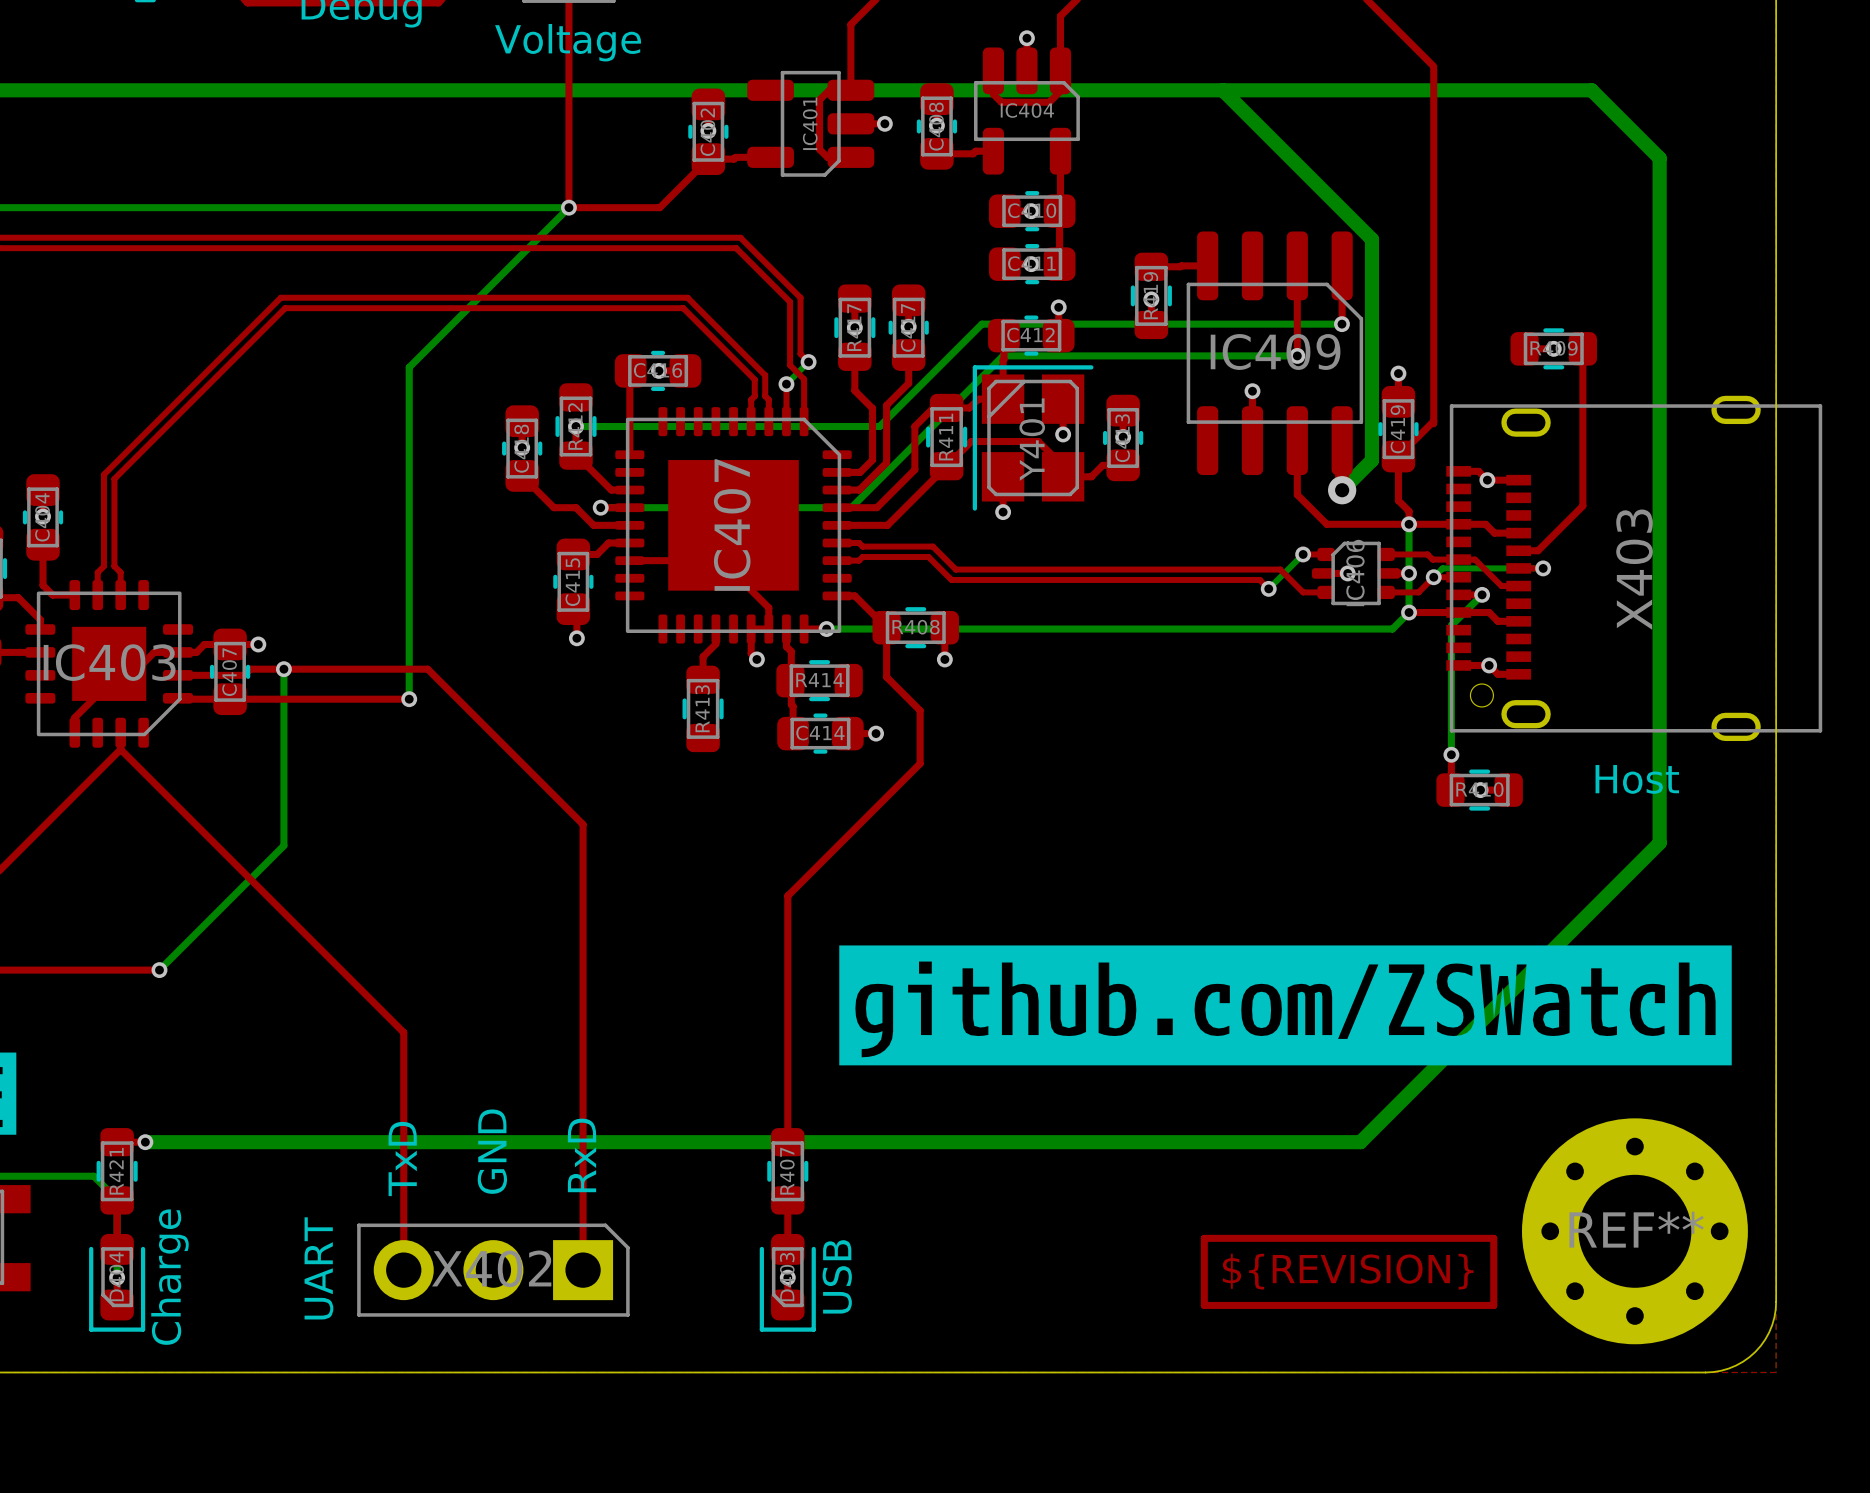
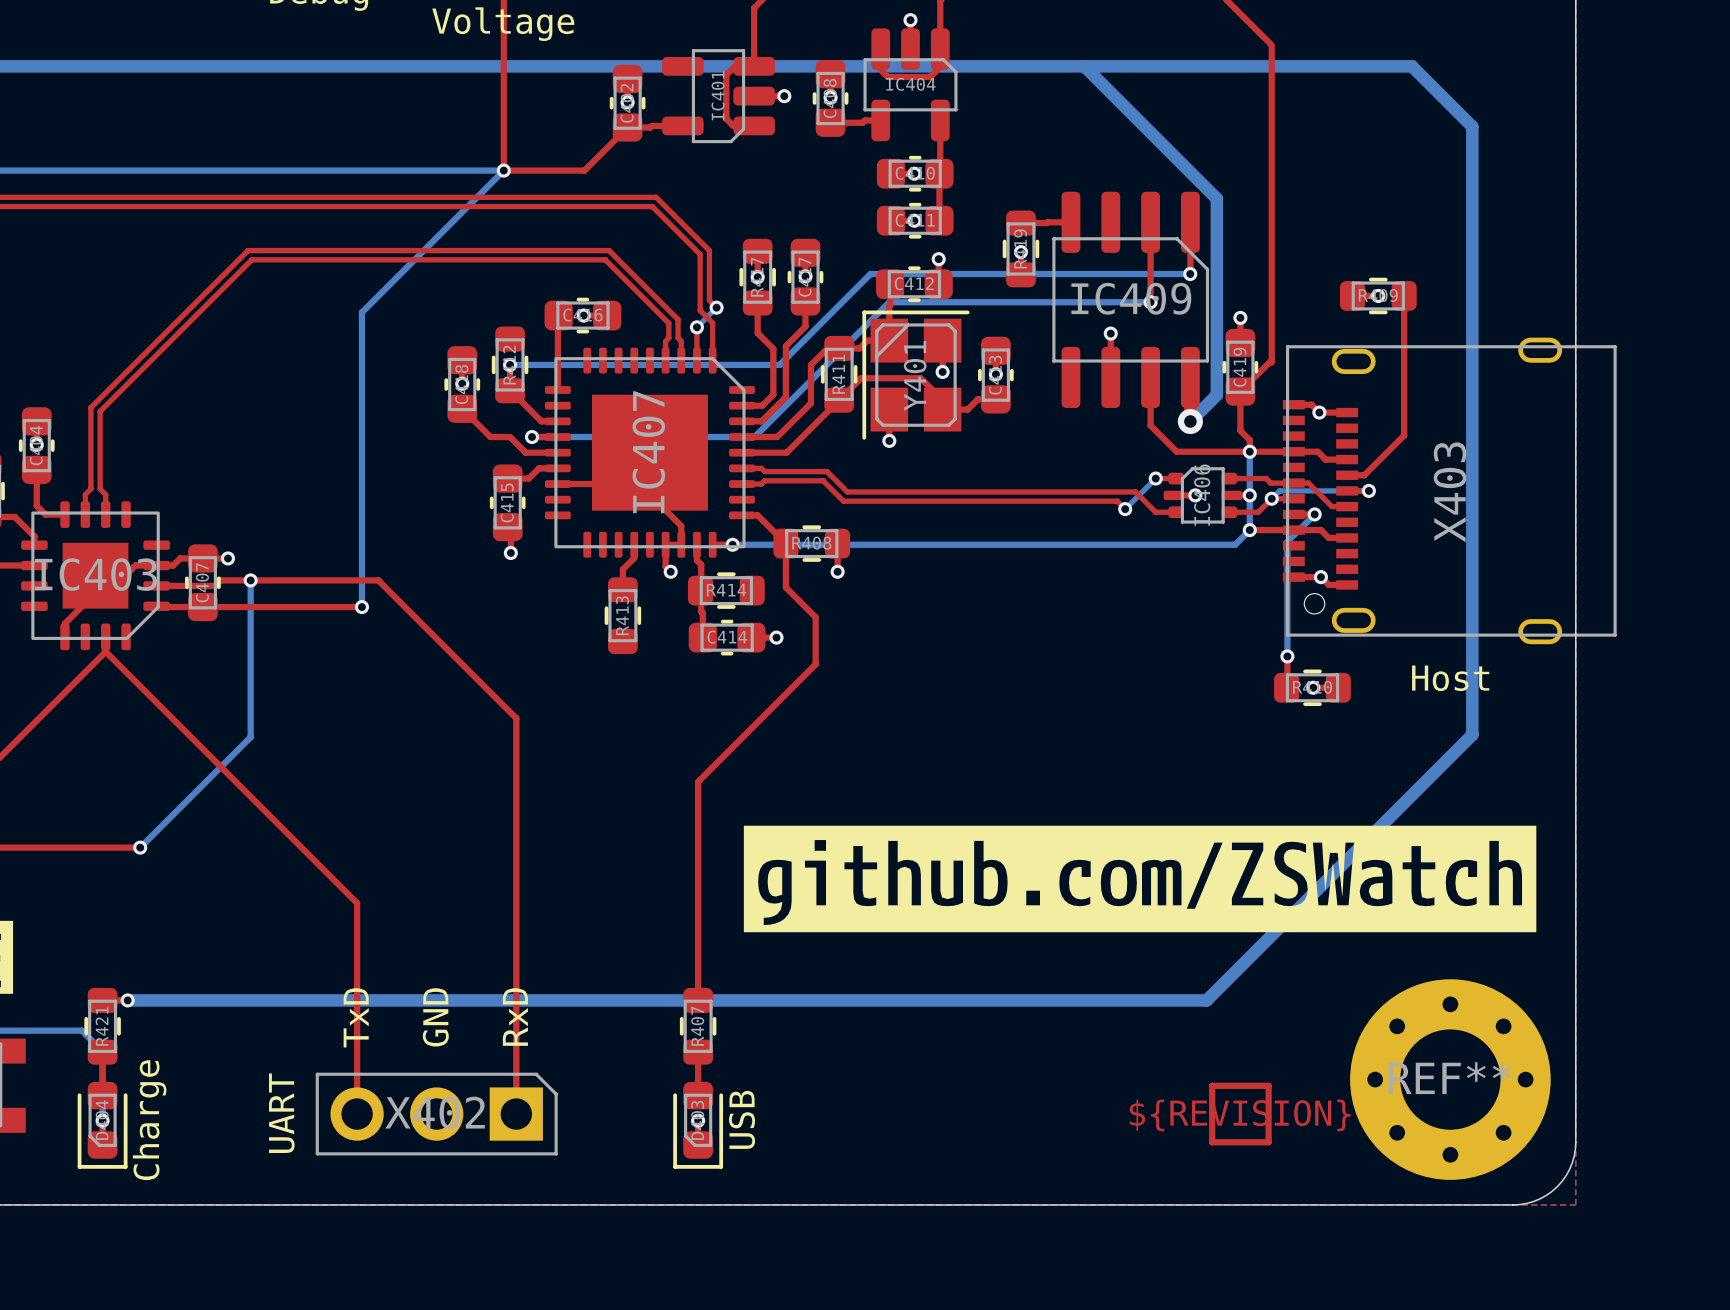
top track: (1366, 1238) (1204, 1238) (1204, 1305) (1493, 1305) (1493, 1238) (1430, 1238) -> (1212, 1085) (1212, 1142) (1268, 1142) (1268, 1085)
text position: ${REVISION} (1348, 1271) -> ${REVISION} (1240, 1115)

